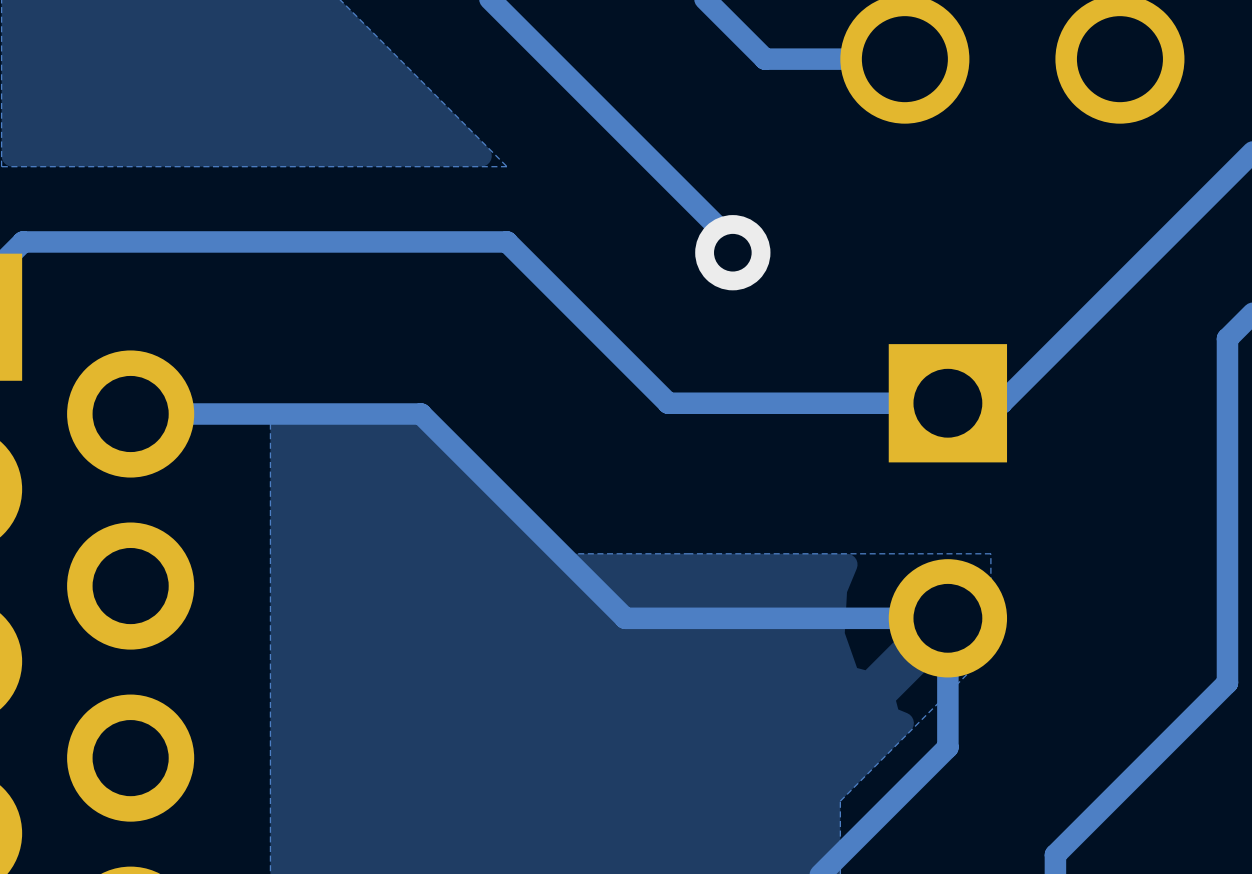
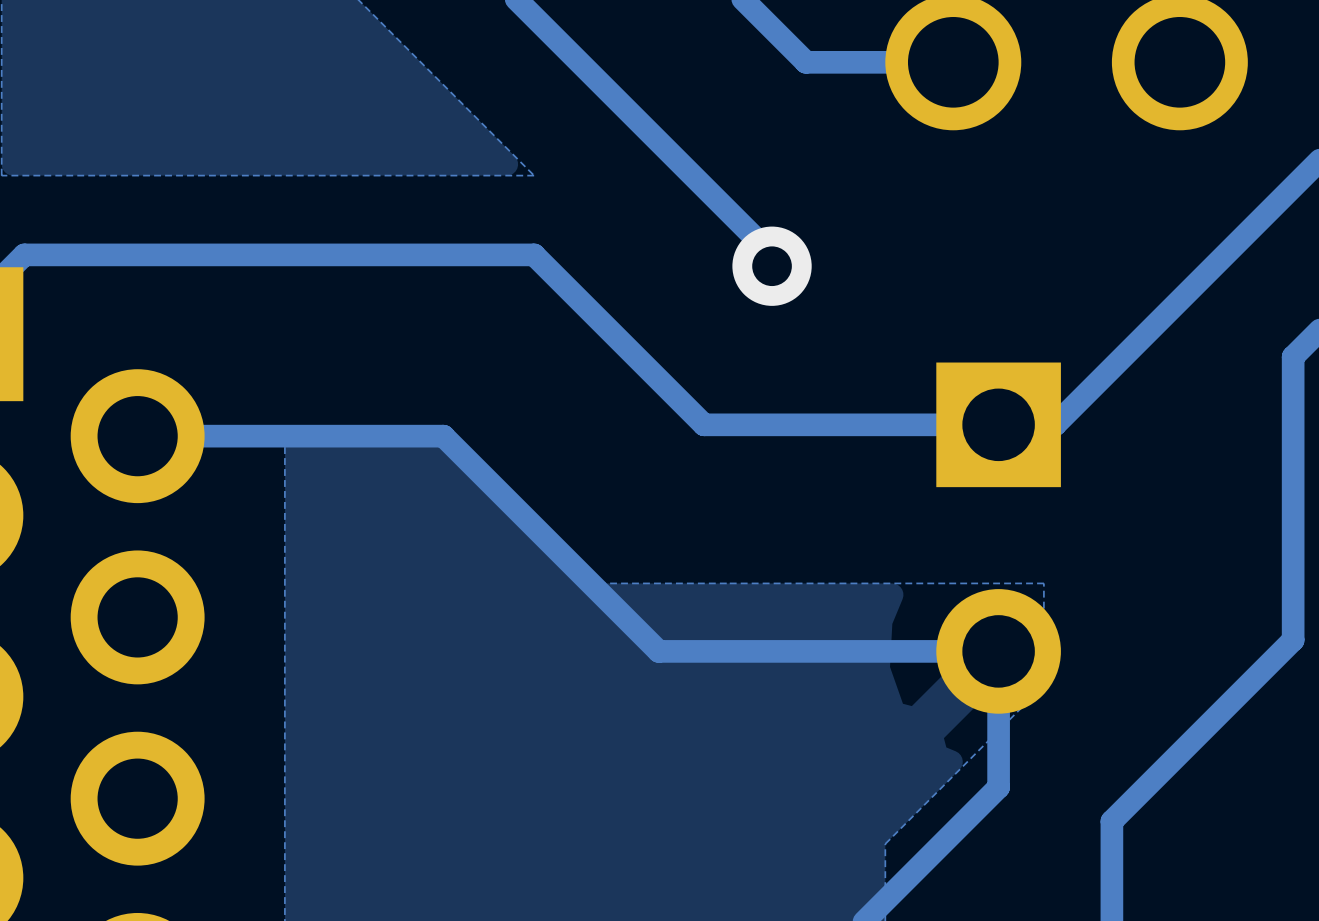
track: (1227, 607) (1227, 682) (1055, 854) -> (1293, 640) (1111, 821) (1111, 900)

